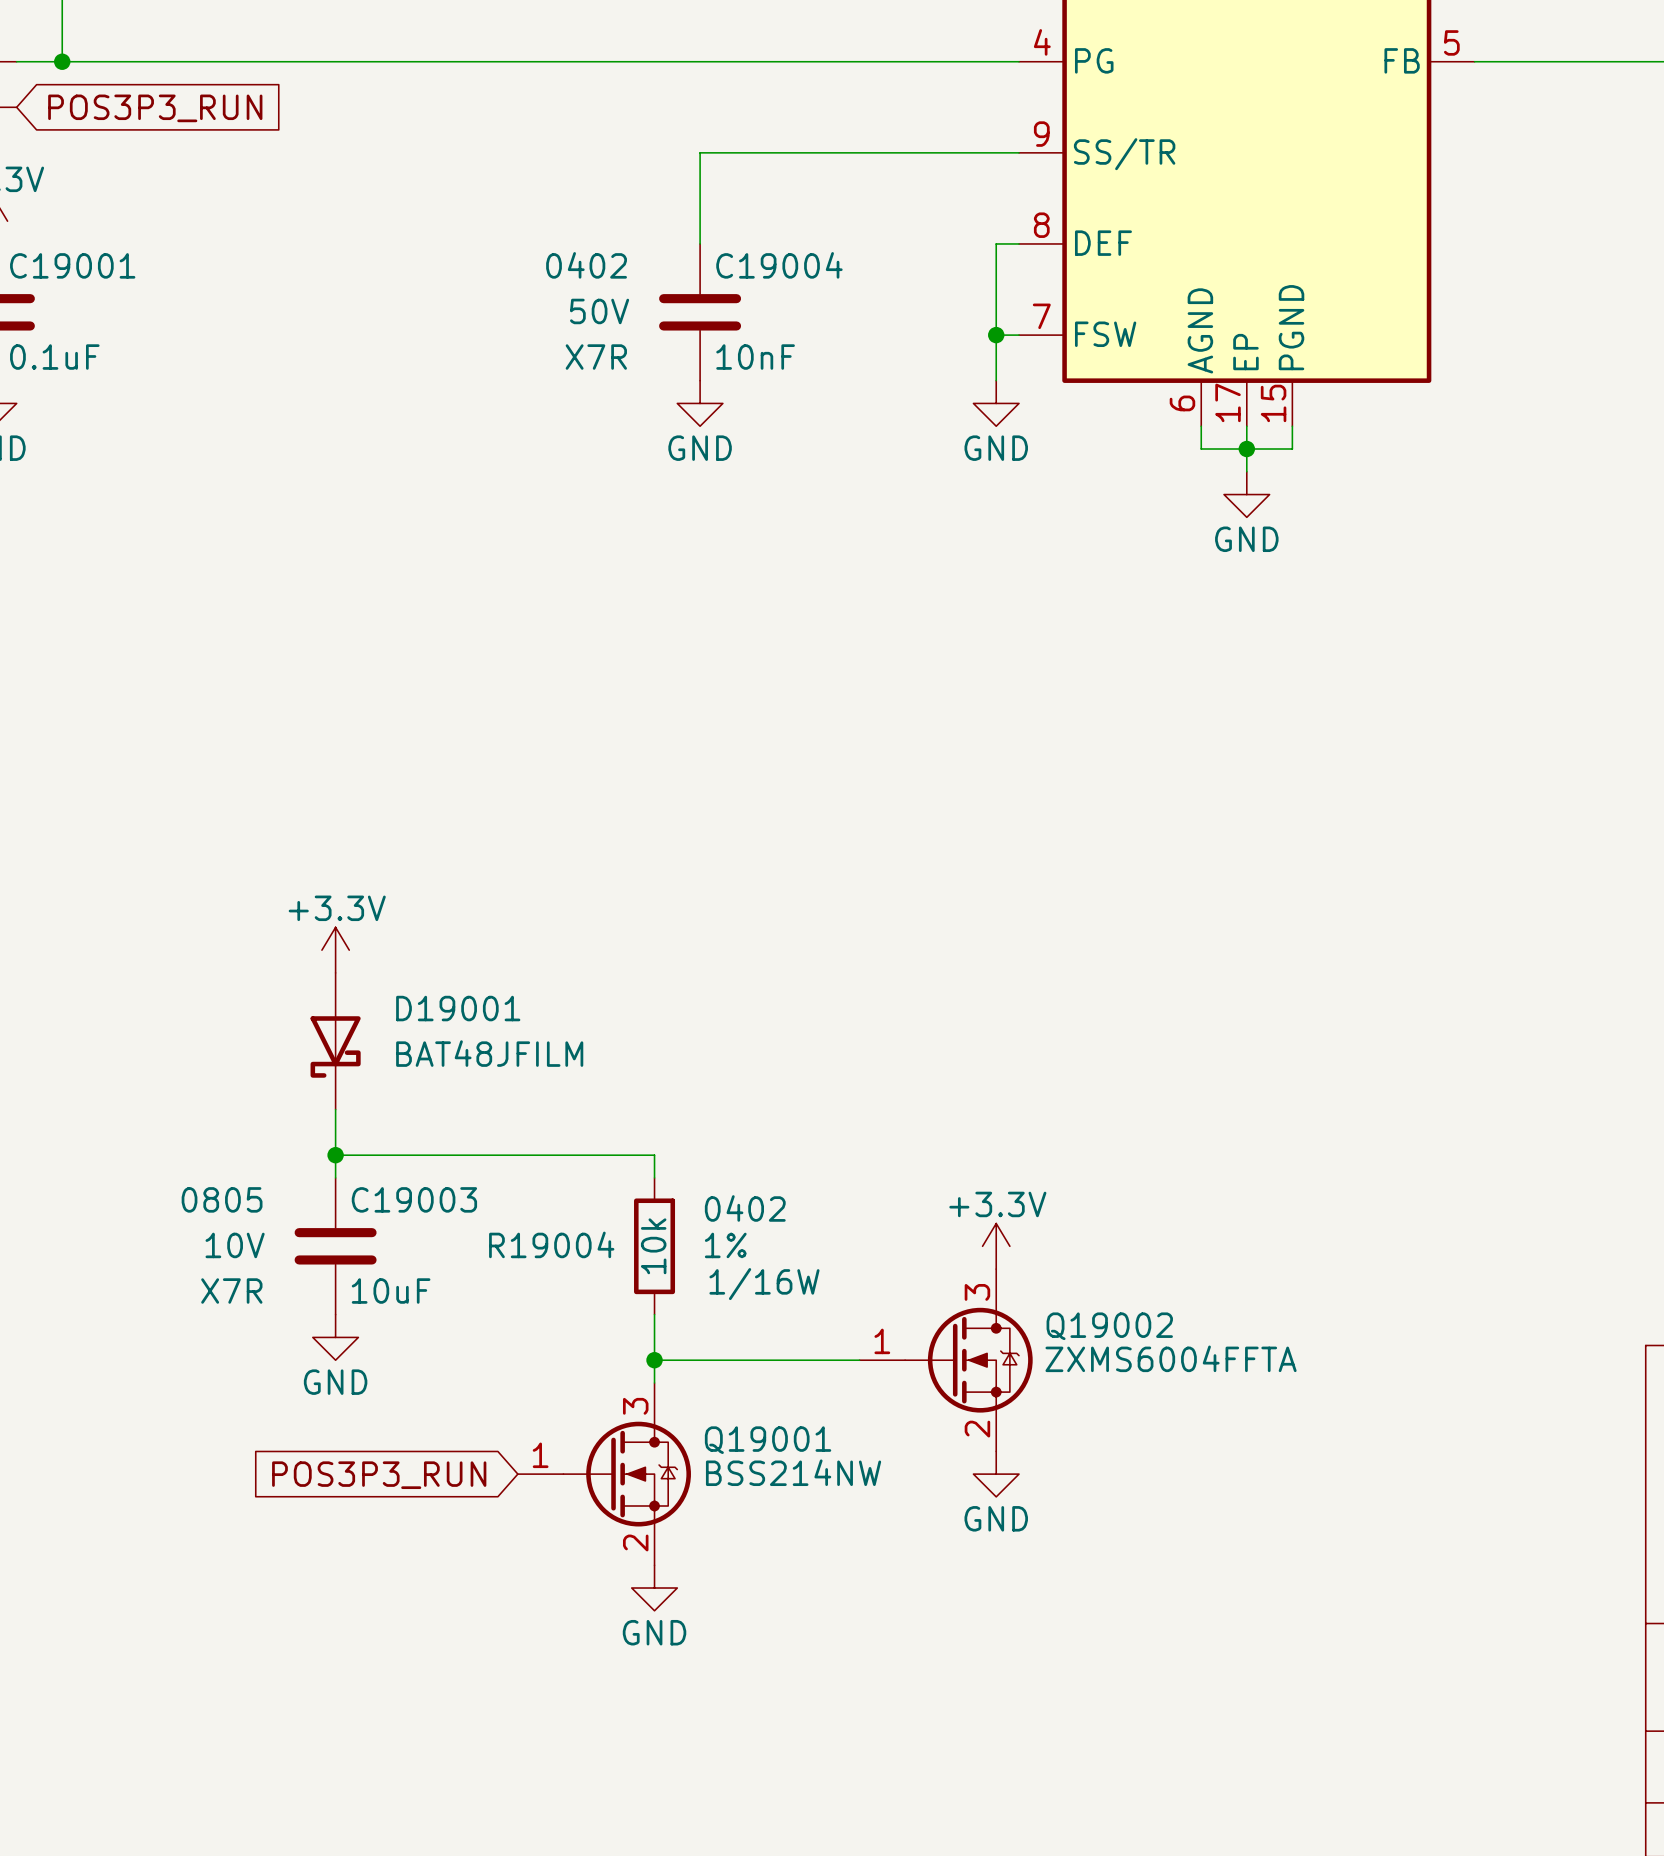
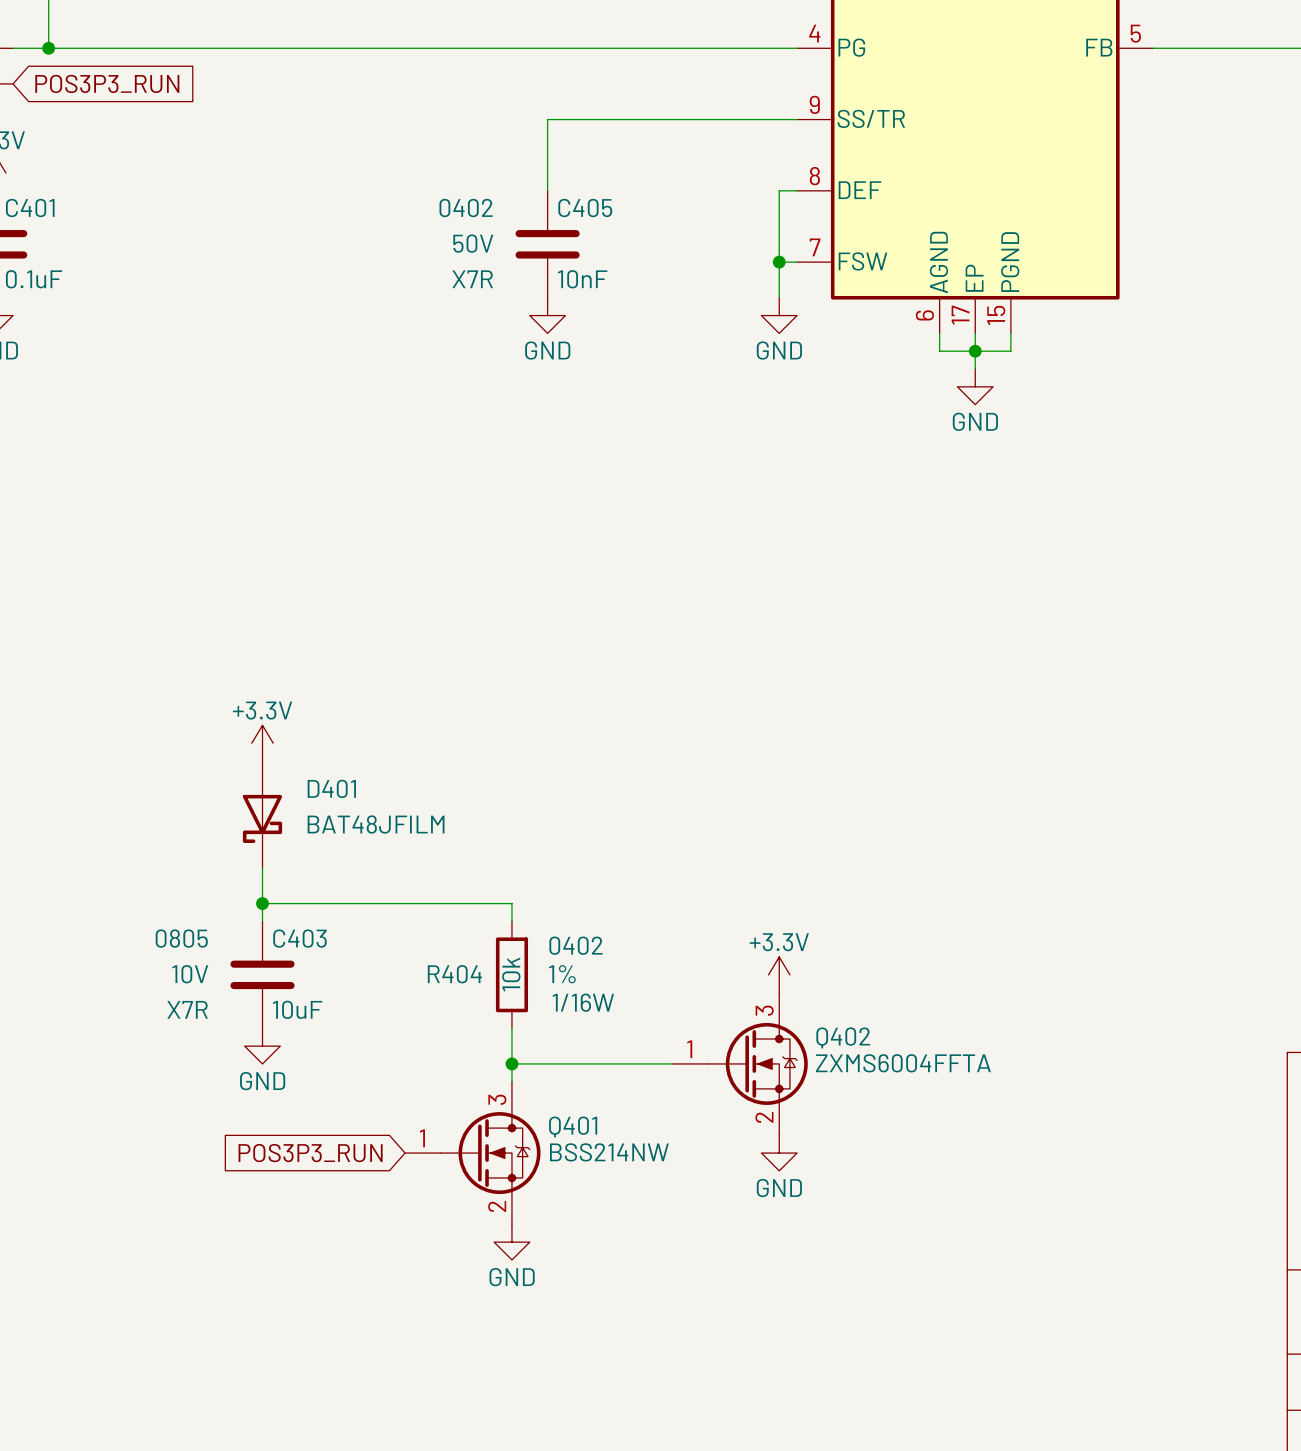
C19001 name: C19001 (72, 265) -> C401 (30, 208)
C19004 name: C19004 (779, 265) -> C405 (585, 208)
D19001 name: D19001 (458, 1008) -> D401 (331, 788)
C19003 name: C19003 (414, 1199) -> C403 (299, 938)
R19004 name: R19004 (551, 1244) -> R404 (454, 974)
Q19002 name: Q19002 (1109, 1326) -> Q402 (843, 1037)
Q19001 name: Q19001 (768, 1440) -> Q401 (573, 1127)

